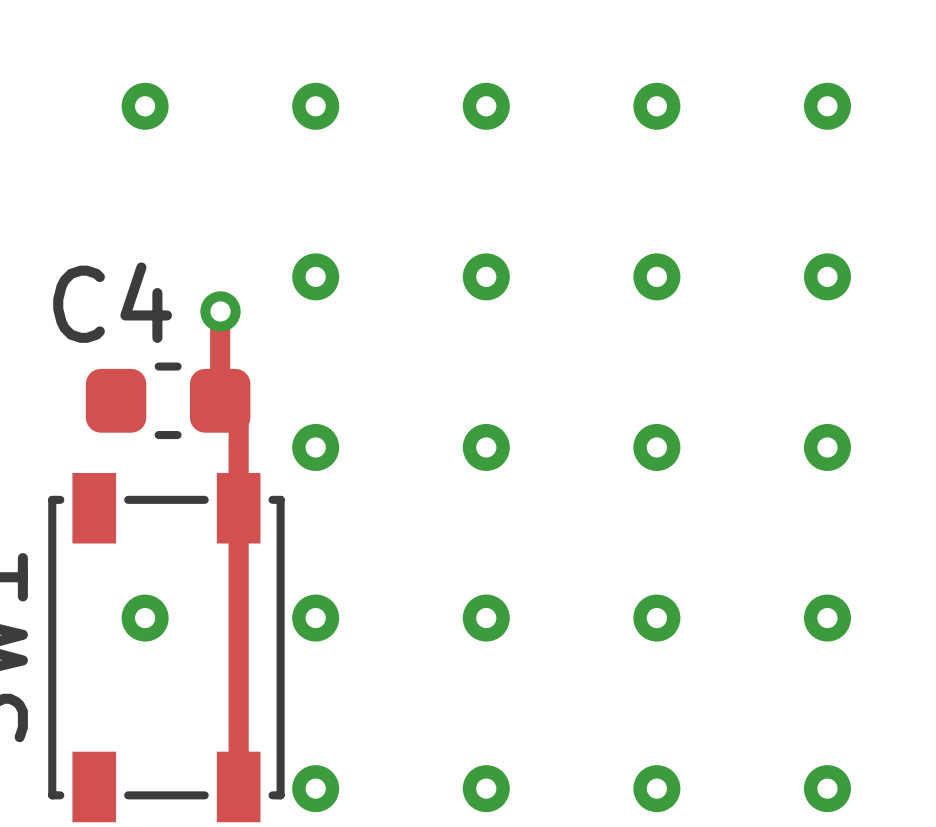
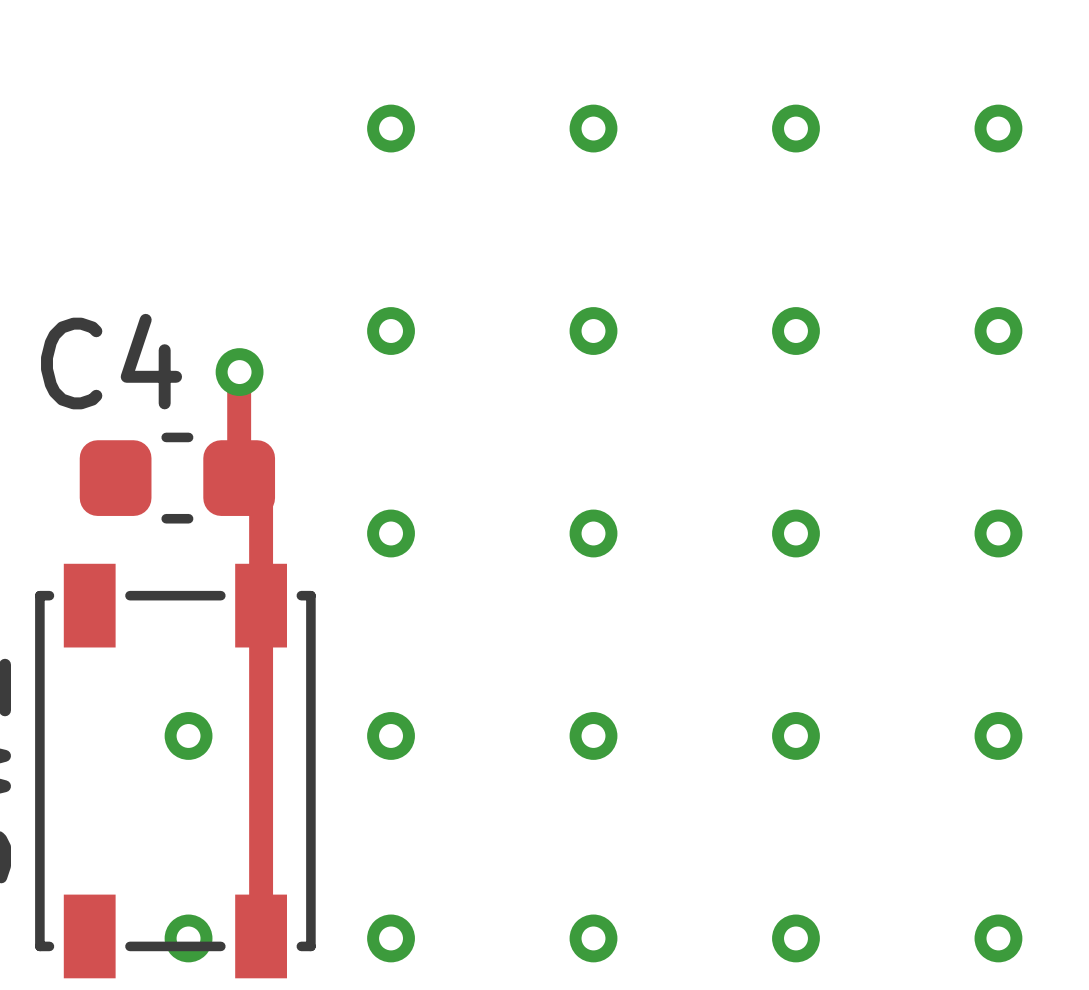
via: (145, 106) -> none
via position: (315, 106) -> (391, 128)
via position: (486, 106) -> (593, 128)
via position: (656, 106) -> (795, 128)
via position: (827, 106) -> (998, 128)
via position: (315, 276) -> (391, 331)
via position: (486, 276) -> (593, 331)
via position: (656, 276) -> (795, 331)
via position: (827, 276) -> (998, 331)
via position: (315, 447) -> (391, 533)
via position: (486, 447) -> (593, 533)
via position: (656, 447) -> (795, 533)
via position: (827, 447) -> (998, 533)
via position: (145, 618) -> (188, 735)
via position: (315, 618) -> (391, 735)
via position: (486, 618) -> (593, 735)
via position: (656, 618) -> (795, 735)
via position: (827, 618) -> (998, 735)
via: none -> (188, 938)
via position: (315, 788) -> (391, 938)
via position: (486, 788) -> (593, 938)
via position: (656, 788) -> (795, 938)
via position: (827, 788) -> (998, 938)

